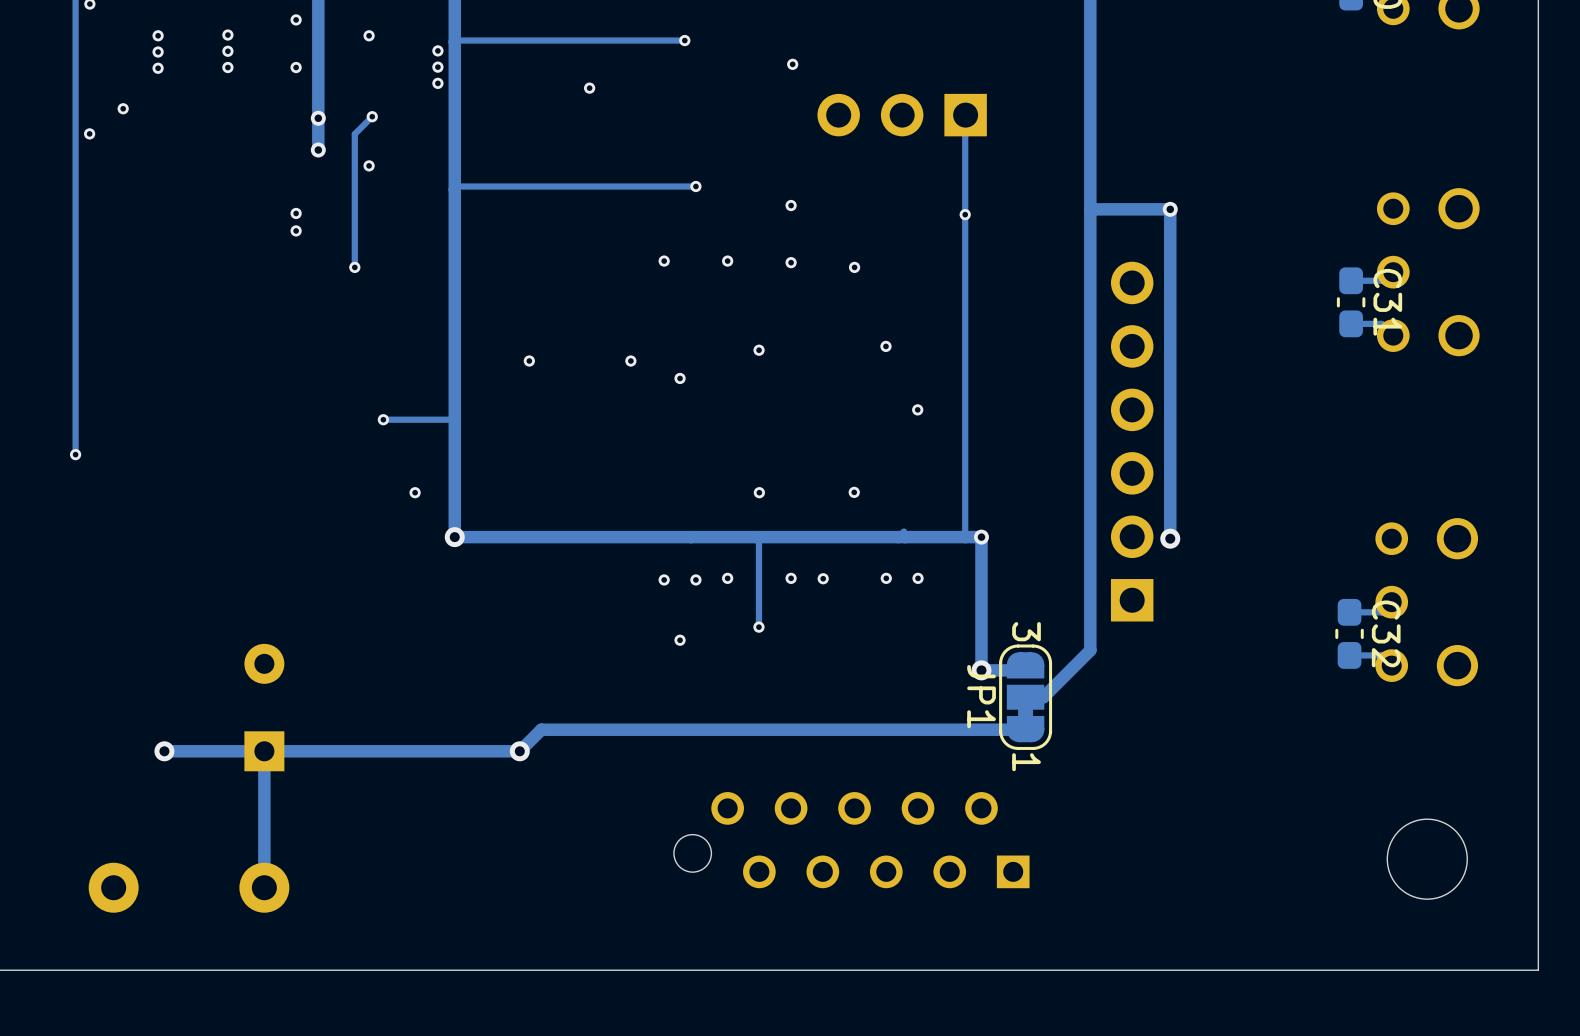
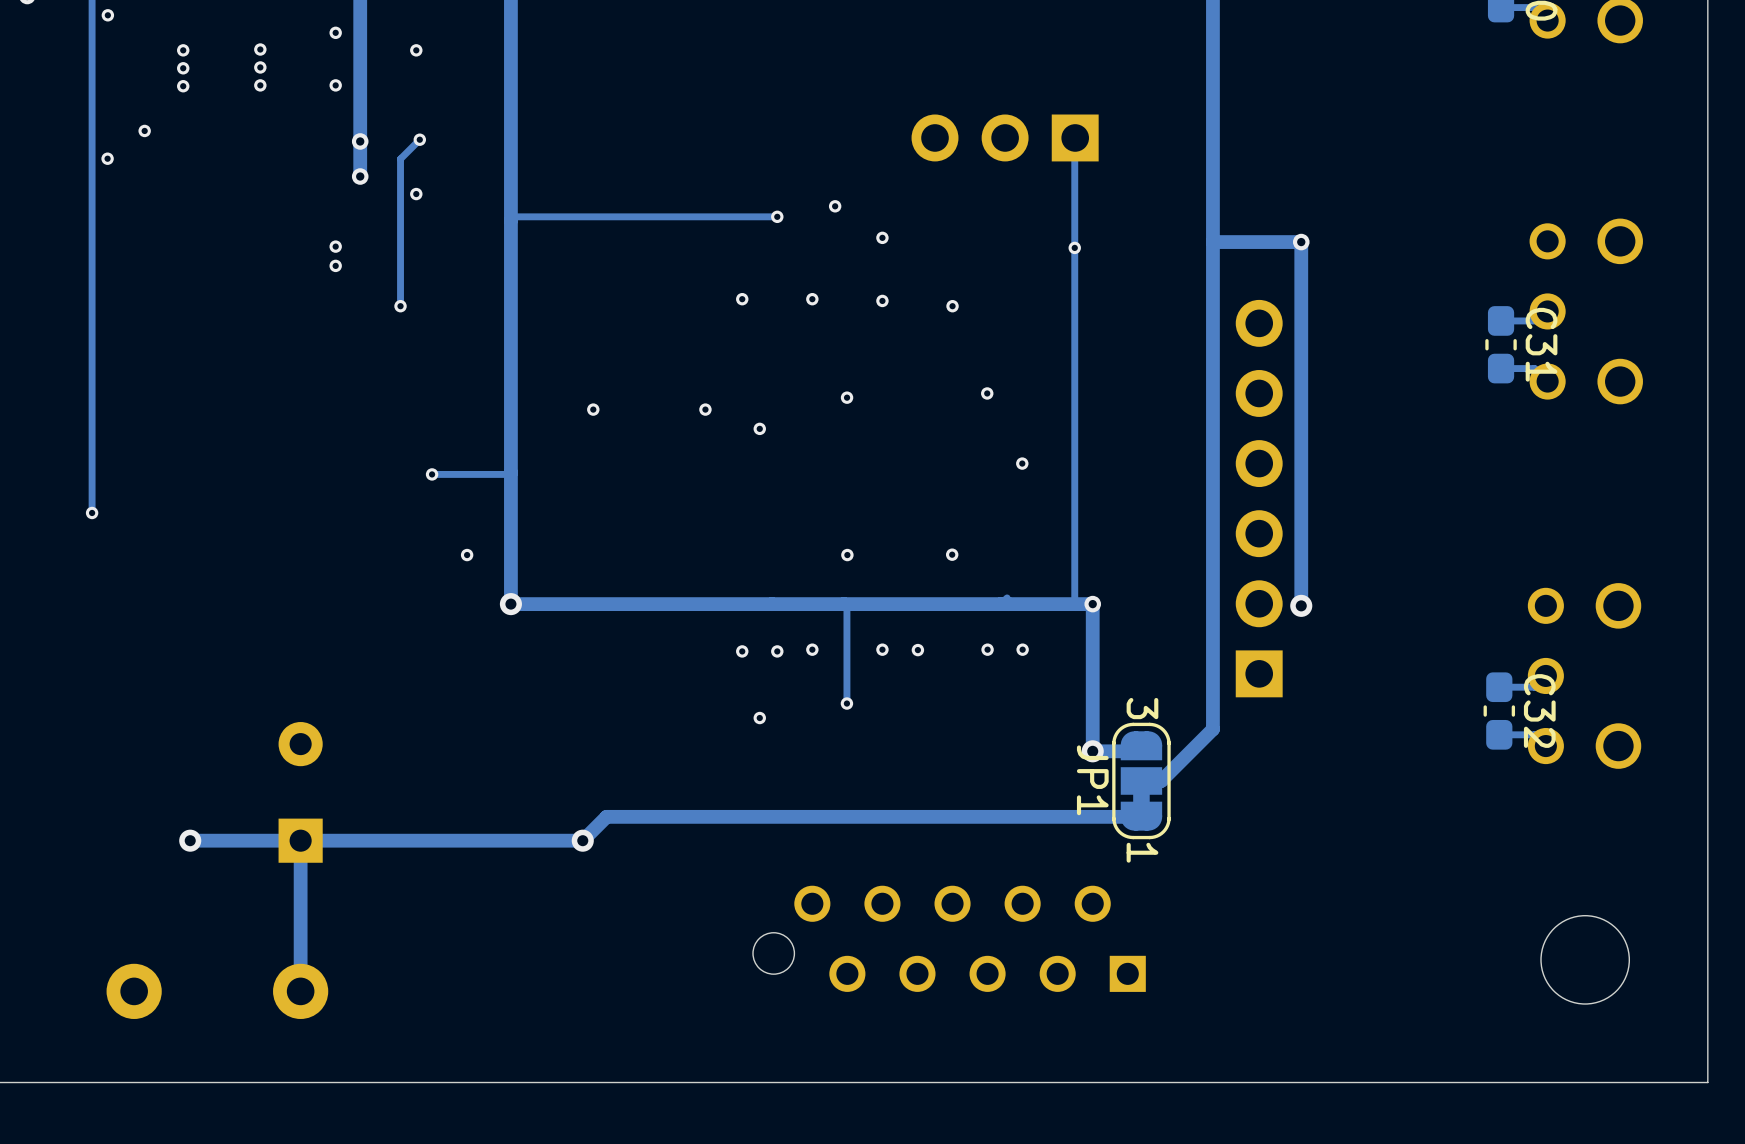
track: (684, 40) (456, 40) (454, 42) -> none
via: (684, 40) -> none
via: (437, 50) -> none
via: (792, 64) -> none
via: (437, 67) -> none
via: (437, 83) -> none
via: (589, 88) -> none
via: none -> (835, 206)

